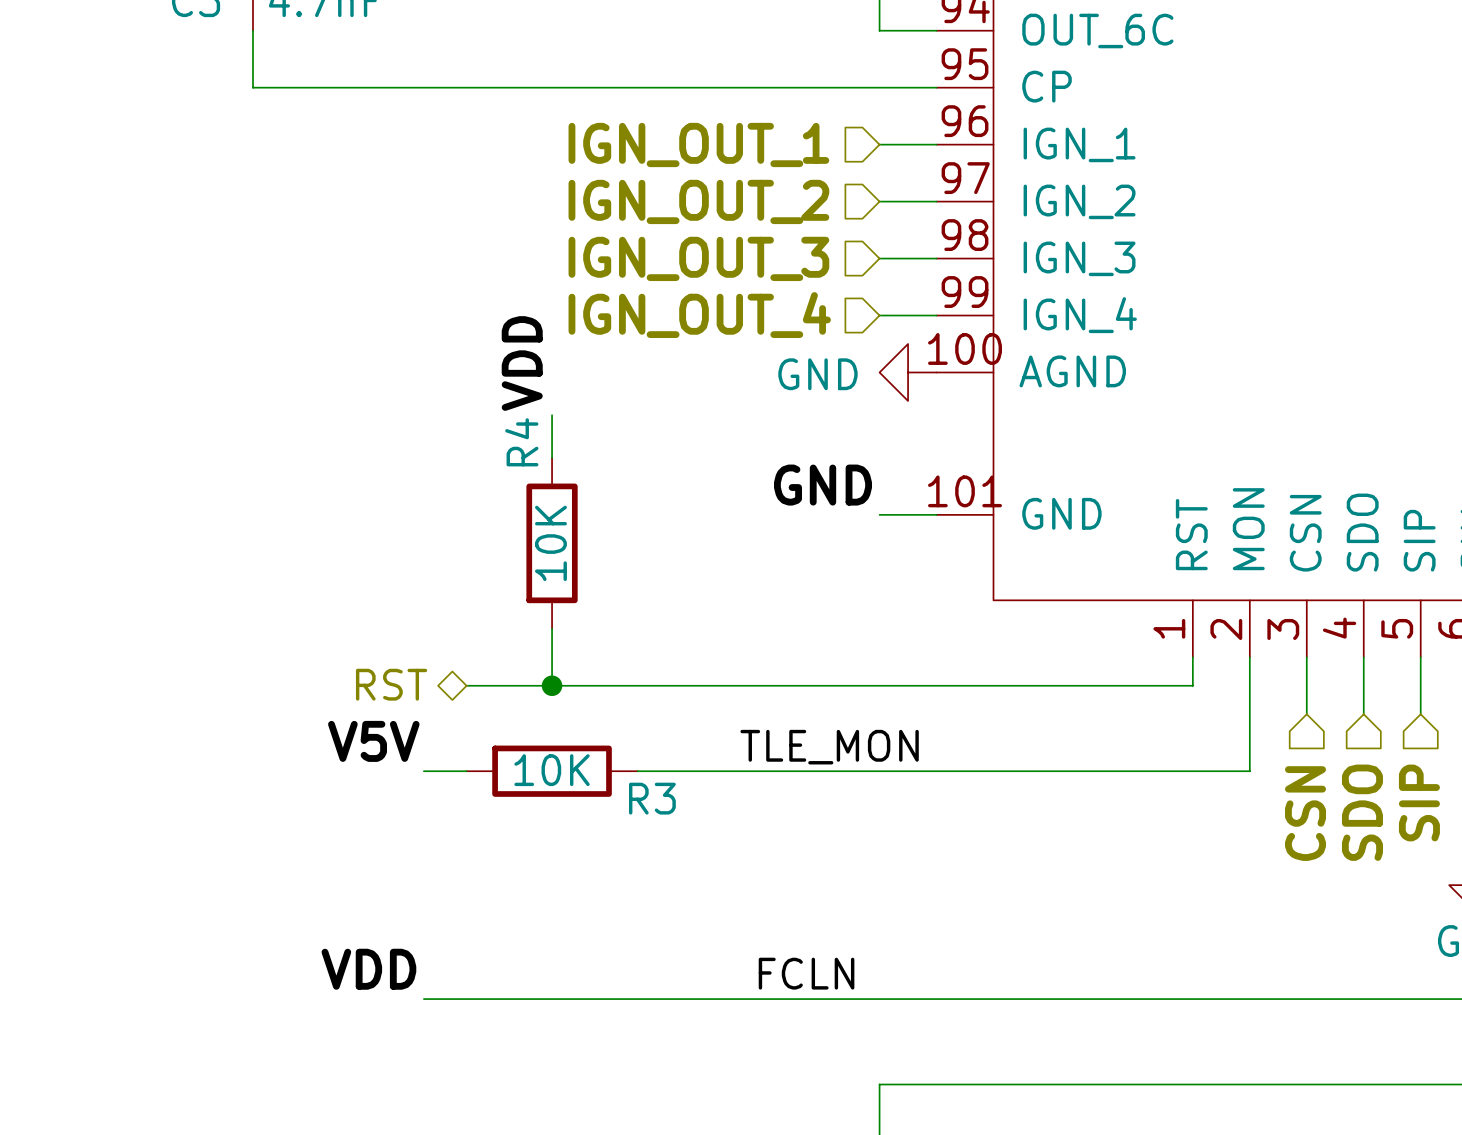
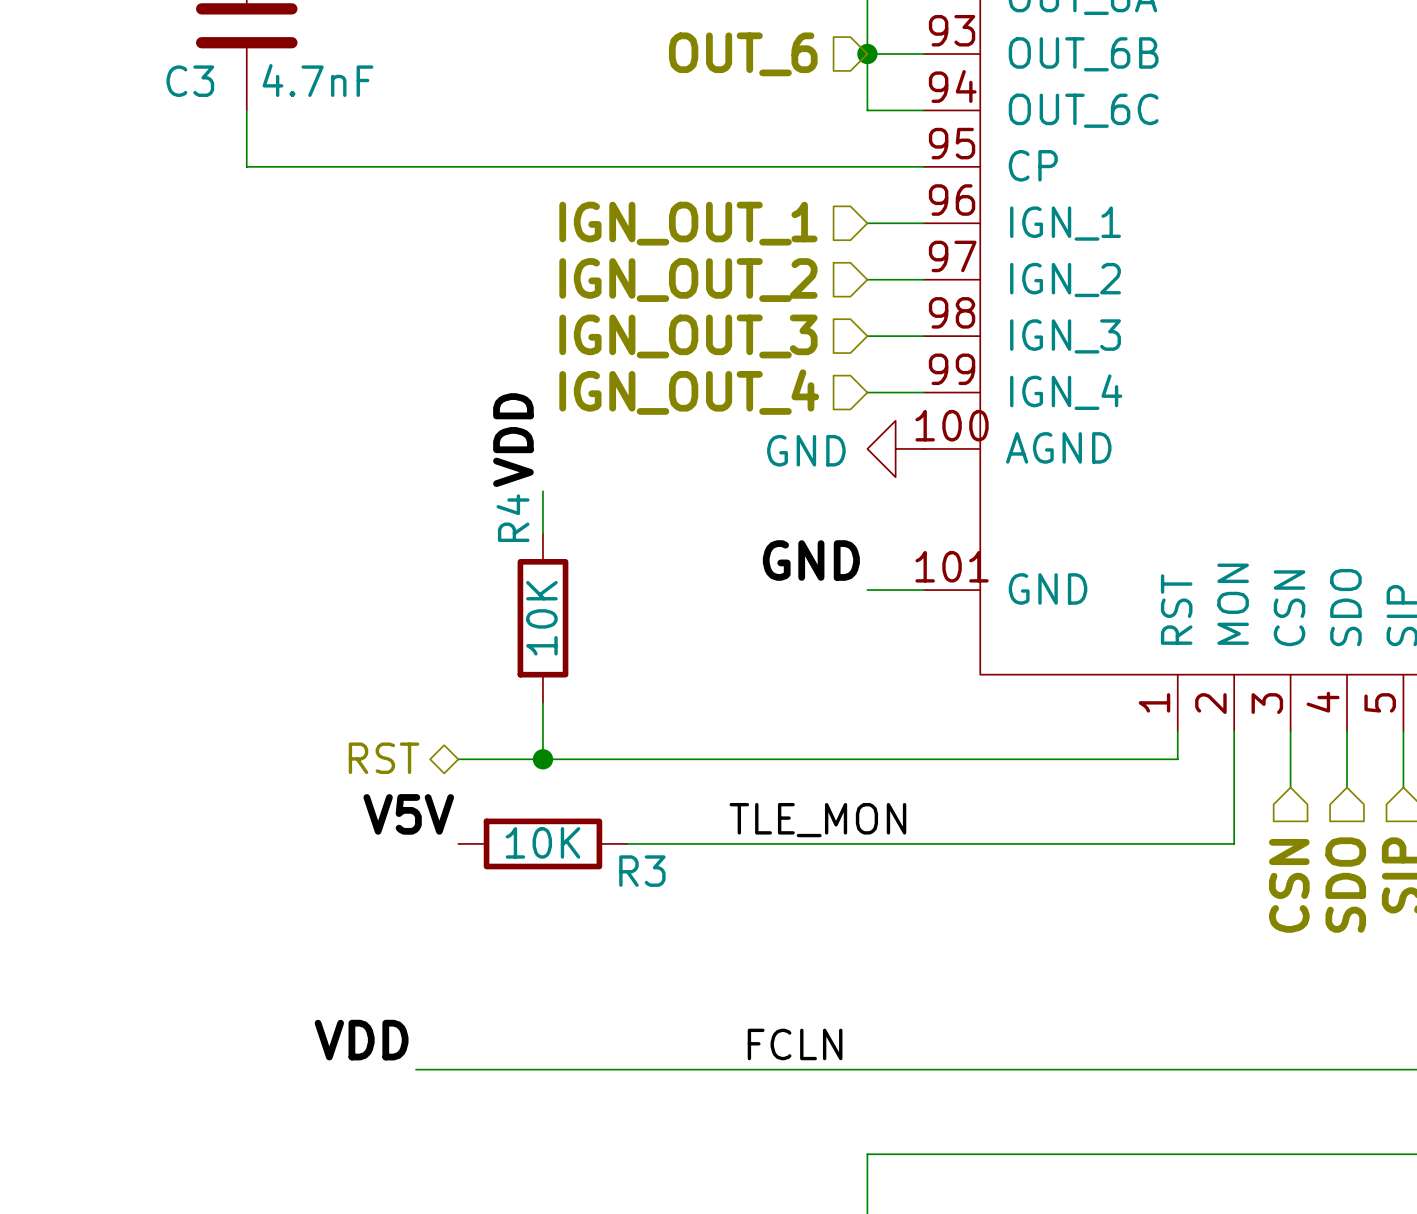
label position: V5V (373, 741) -> V5V (408, 814)
wire: (423, 771) (466, 771) -> none

